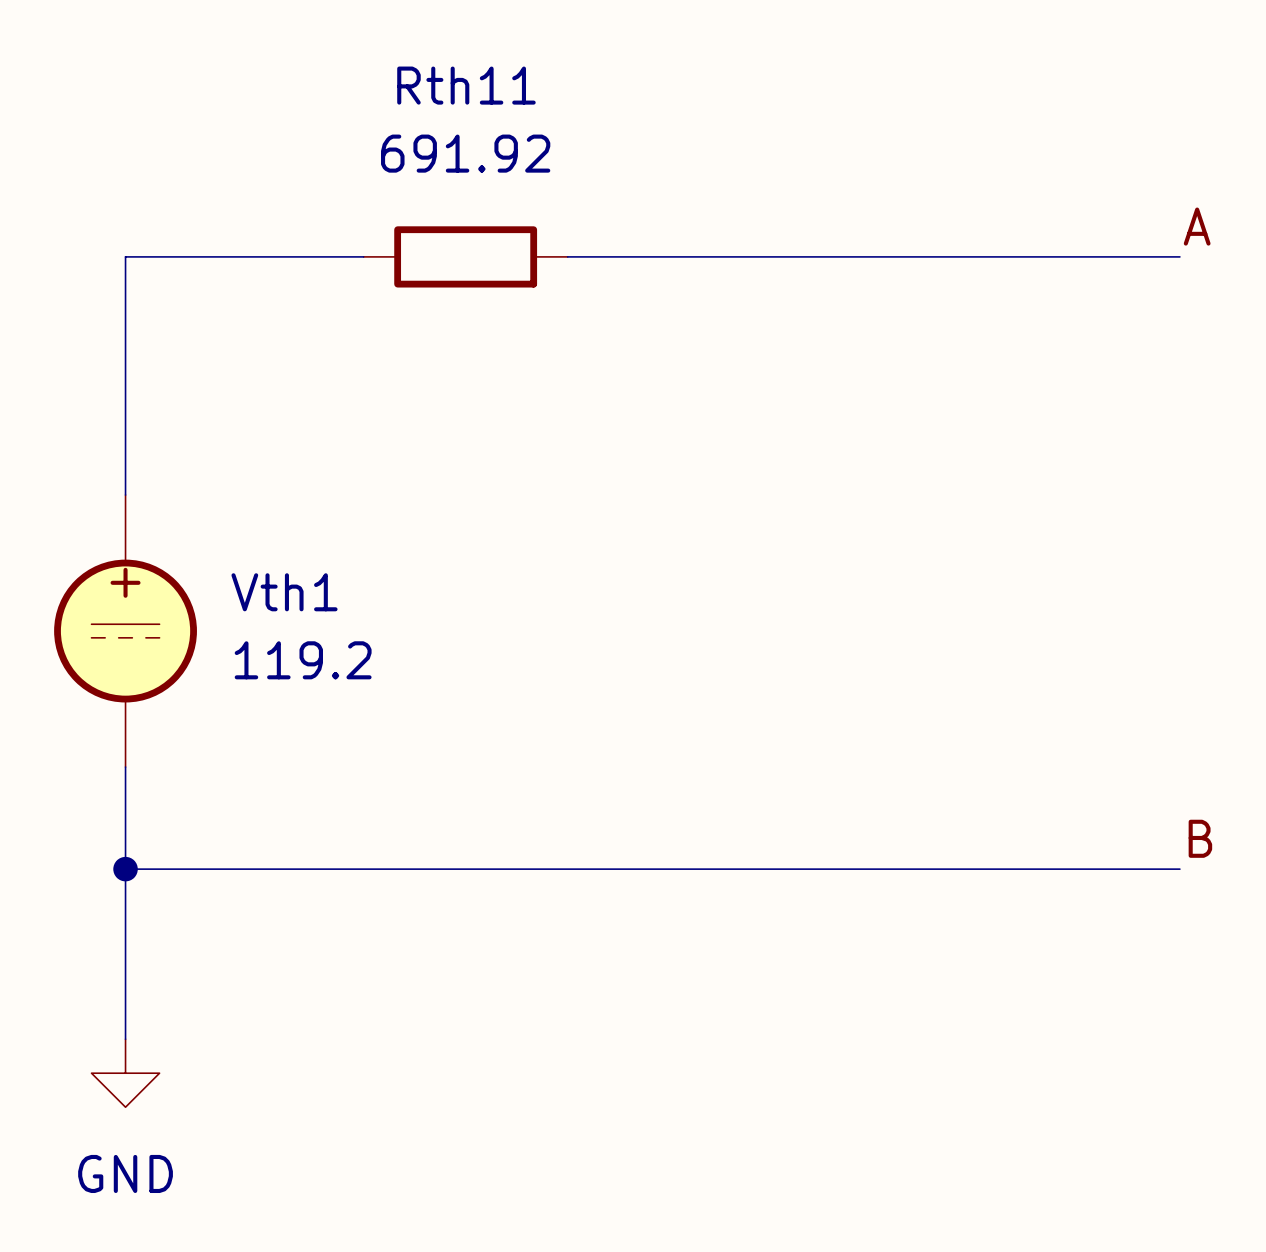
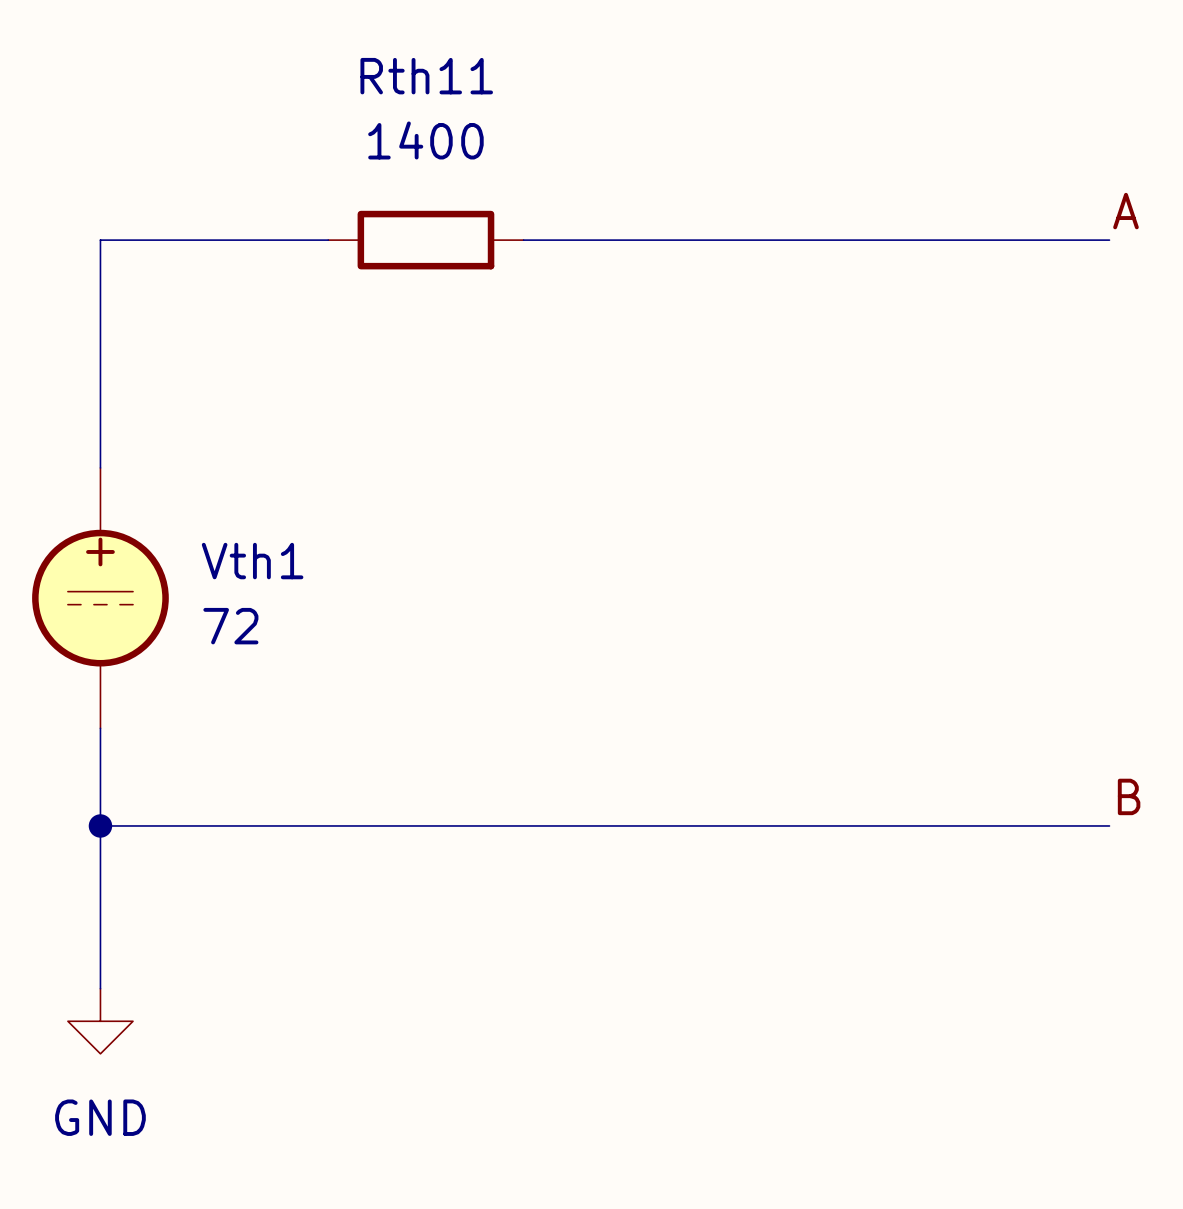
Rth11 value: 691.92 (465, 153) -> 1400 (425, 140)
Vth1 value: 119.2 (303, 660) -> 72 (230, 626)

